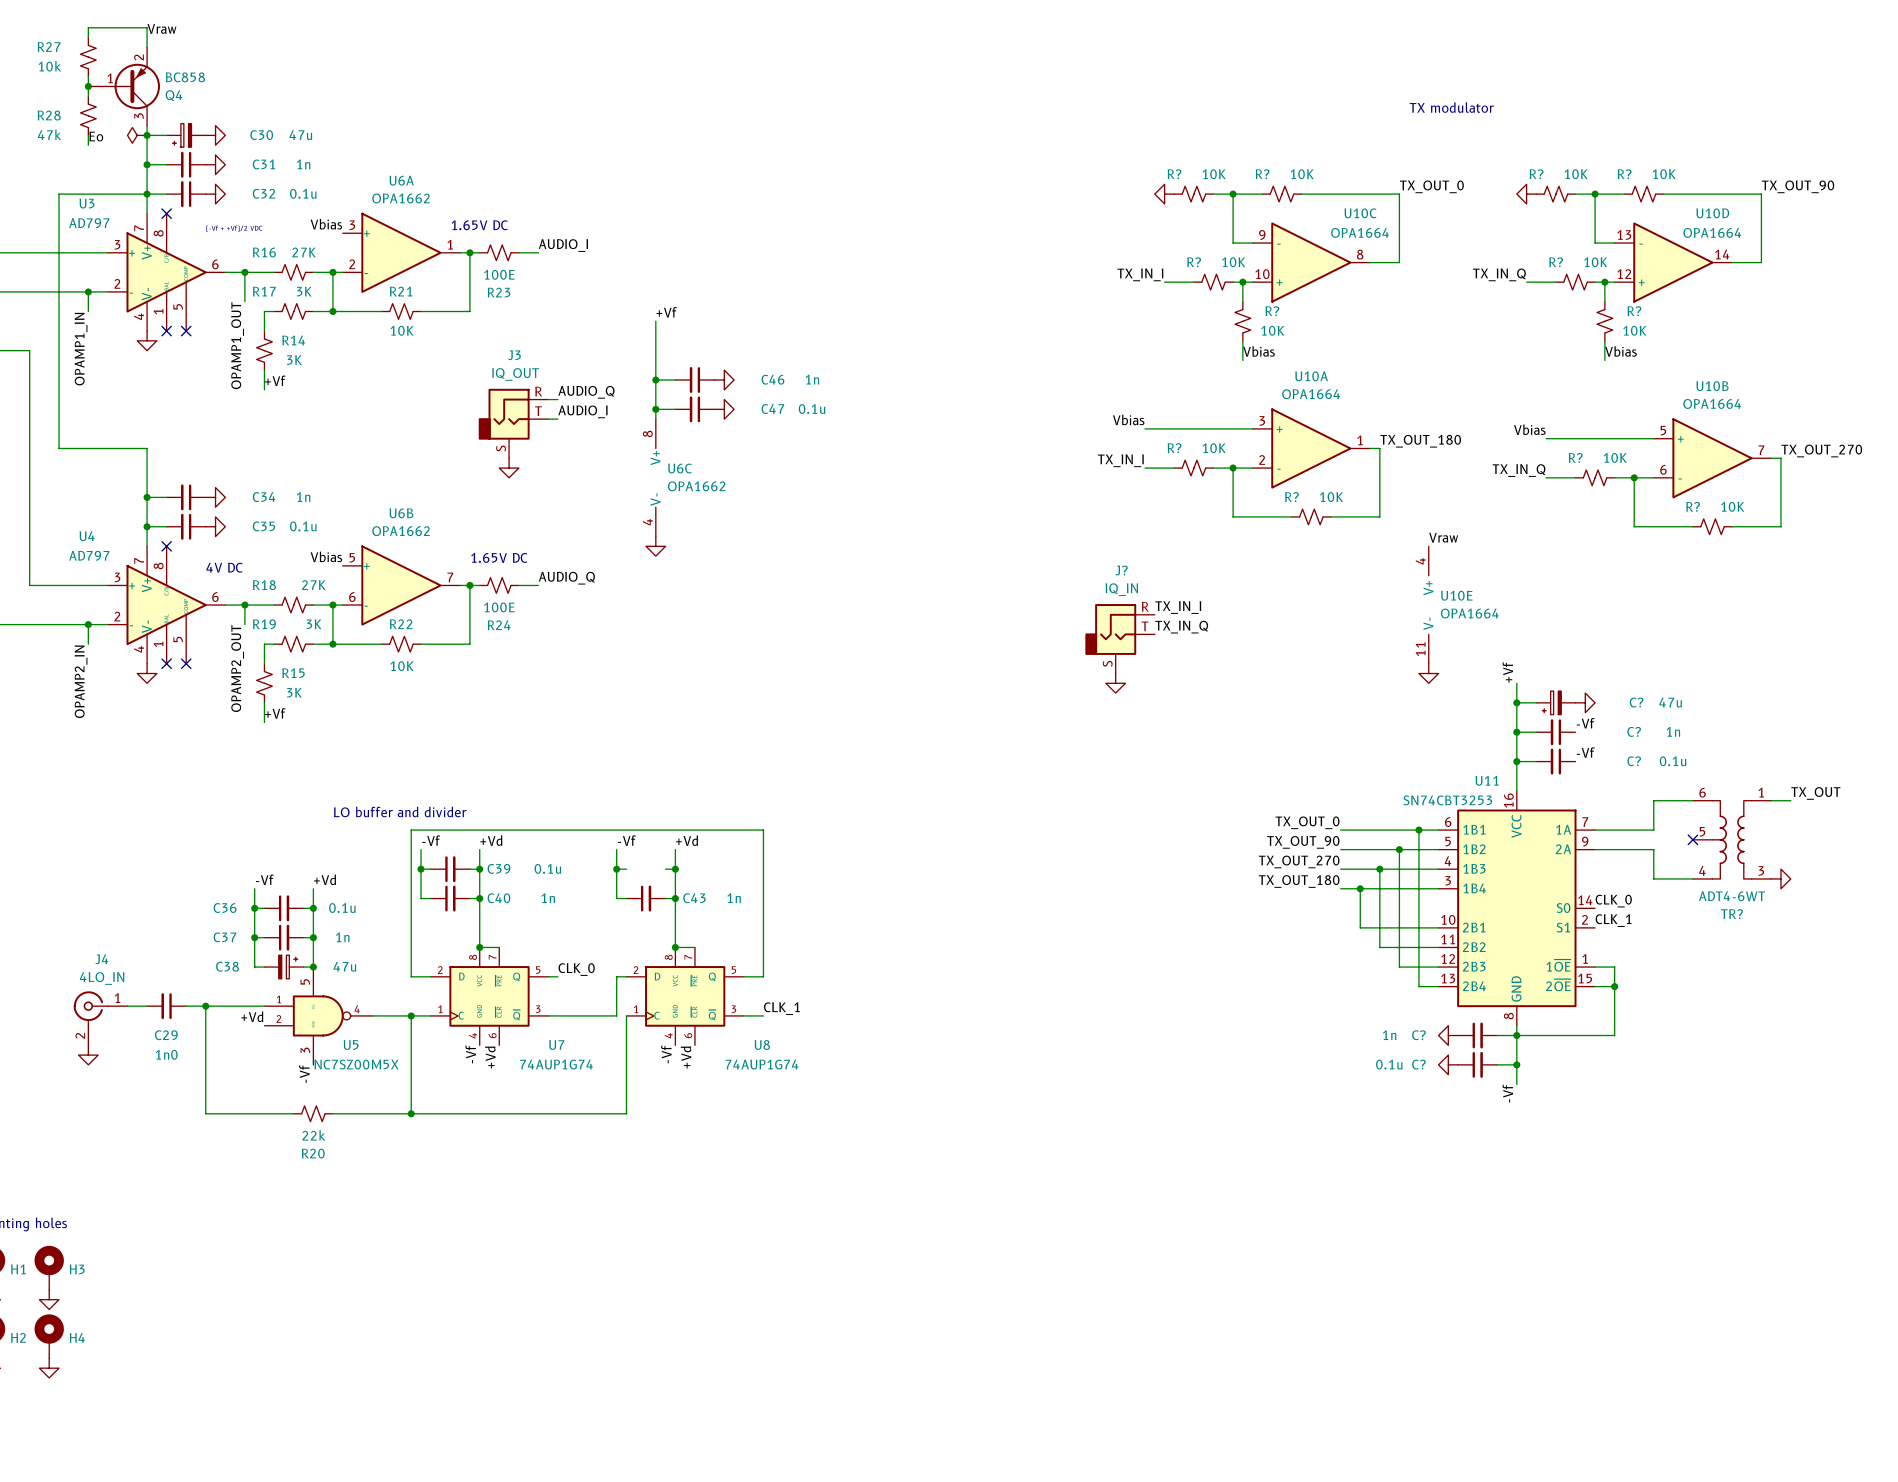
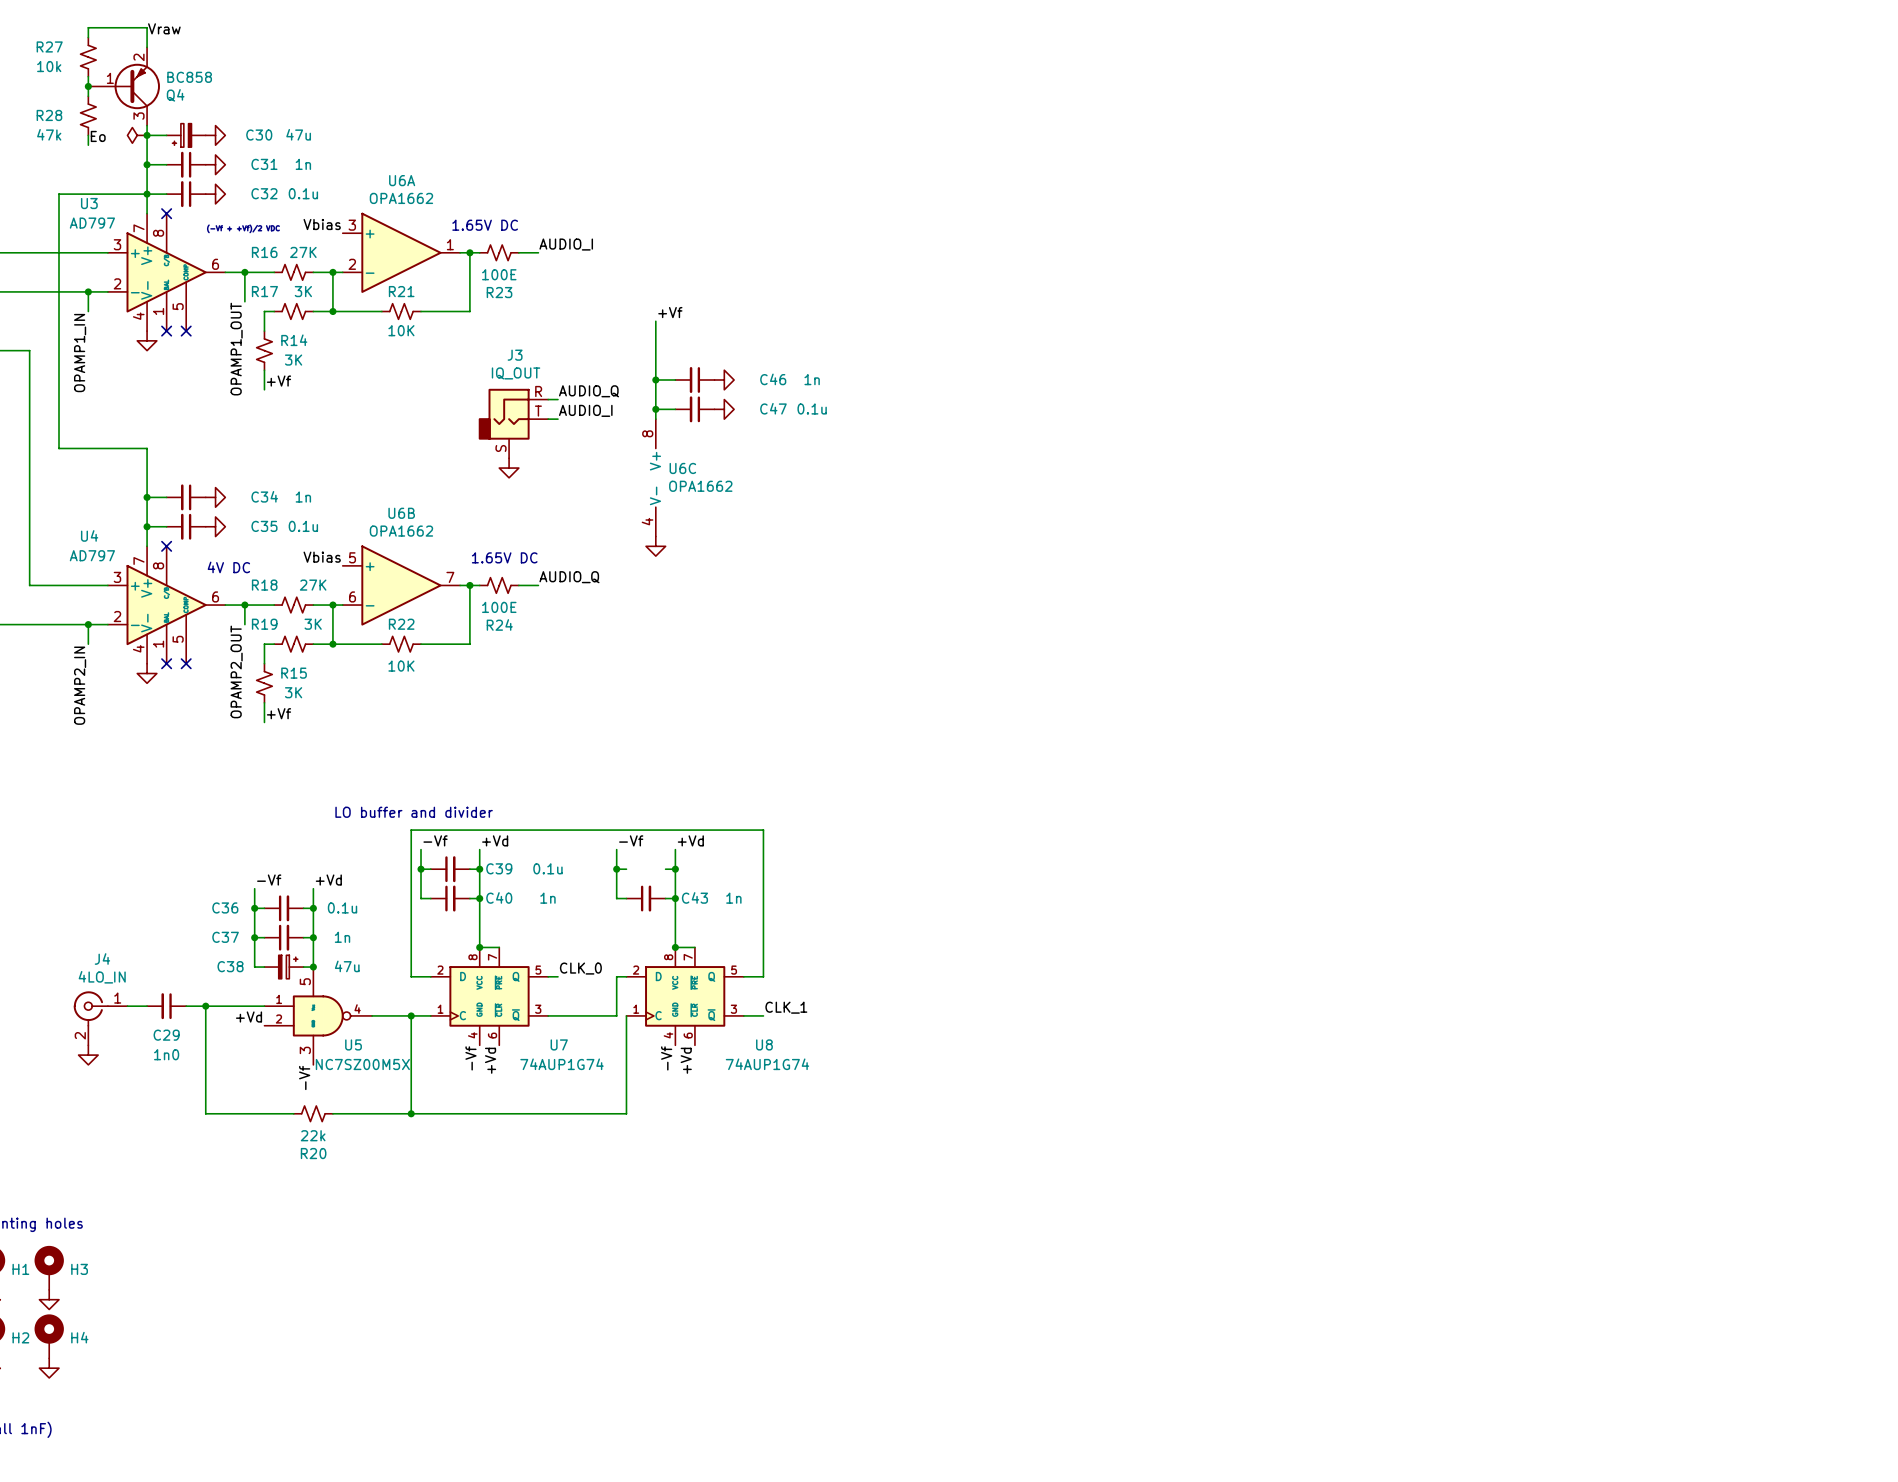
text: TX modulator (1451, 107) -> none
label: TX_OUT_0 (1431, 186) -> none
label: TX_OUT_90 (1798, 186) -> none
power symbol: (1164, 194) -> none
R?: 10K (1193, 194) -> none
wire: (1213, 194) (1262, 194) -> none
wire: (1233, 194) (1233, 243) (1252, 243) -> none
junction: (1233, 194) -> none
R?: 10K (1281, 194) -> none
wire: (1301, 194) (1399, 194) (1399, 262) (1370, 262) -> none
power symbol: (1526, 194) -> none
R?: 10K (1555, 194) -> none
wire: (1575, 194) (1624, 194) -> none
wire: (1595, 194) (1595, 243) (1614, 243) -> none
junction: (1595, 194) -> none
R?: 10K (1644, 194) -> none
wire: (1663, 194) (1761, 194) (1761, 262) (1732, 262) -> none
U10C: OPA1664 (1311, 262) -> none
U10D: OPA1664 (1673, 262) -> none
label: TX_IN_I (1140, 274) -> none
label: TX_IN_Q (1499, 274) -> none
wire: (1164, 282) (1193, 282) -> none
R?: 10K (1213, 282) -> none
wire: (1233, 282) (1252, 282) -> none
wire: (1242, 282) (1242, 301) -> none
junction: (1242, 282) -> none
wire: (1526, 282) (1555, 282) -> none
R?: 10K (1575, 282) -> none
wire: (1595, 282) (1614, 282) -> none
wire: (1604, 282) (1604, 301) -> none
junction: (1604, 282) -> none
R?: 10K (1242, 321) -> none
R?: 10K (1604, 321) -> none
wire: (1242, 340) (1242, 360) -> none
wire: (1604, 340) (1604, 360) -> none
label: Vbias (1259, 351) -> none
label: Vbias (1621, 351) -> none
label: Vbias (1128, 419) -> none
wire: (1145, 428) (1252, 428) -> none
label: Vbias (1529, 429) -> none
wire: (1546, 438) (1653, 438) -> none
label: TX_OUT_180 (1420, 441) -> none
U10A: OPA1664 (1311, 448) -> none
wire: (1370, 448) (1379, 448) (1379, 516) (1330, 516) -> none
label: TX_OUT_270 (1821, 451) -> none
U10B: OPA1664 (1712, 458) -> none
wire: (1771, 458) (1780, 458) (1780, 526) (1732, 526) -> none
label: TX_IN_I (1120, 460) -> none
wire: (1145, 468) (1174, 468) -> none
R?: 10K (1193, 468) -> none
wire: (1213, 468) (1252, 468) -> none
wire: (1233, 468) (1233, 516) (1291, 516) -> none
junction: (1233, 468) -> none
label: TX_IN_Q (1518, 470) -> none
wire: (1546, 477) (1575, 477) -> none
R?: 10K (1595, 477) -> none
wire: (1614, 477) (1653, 477) -> none
wire: (1634, 477) (1634, 526) (1692, 526) -> none
junction: (1634, 477) -> none
R?: 10K (1311, 516) -> none
R?: 10K (1712, 526) -> none
label: Vraw (1443, 537) -> none
U10E: OPA1664 (1428, 605) -> none
label: TX_IN_I (1178, 607) -> none
label: TX_IN_Q (1181, 627) -> none
J?: IQ_IN (1120, 638) -> none
label: +Vf (1507, 672) -> none
power symbol: (1428, 673) -> none
power symbol: (1115, 683) -> none
wire: (1516, 683) (1516, 790) -> none
wire: (1516, 702) (1536, 702) -> none
junction: (1516, 702) -> none
C?: 47u (1555, 702) -> none
power symbol: (1585, 702) -> none
label: -Vf (1585, 723) -> none
wire: (1516, 732) (1536, 732) -> none
junction: (1516, 732) -> none
C?: 1n (1555, 732) -> none
label: -Vf (1585, 752) -> none
wire: (1516, 761) (1536, 761) -> none
junction: (1516, 761) -> none
C?: 0.1u (1555, 761) -> none
label: TX_OUT (1815, 793) -> none
wire: (1692, 800) (1653, 800) (1653, 830) (1595, 830) -> none
wire: (1771, 800) (1790, 800) -> none
label: TX_OUT_0 (1307, 822) -> none
wire: (1340, 830) (1438, 830) -> none
wire: (1418, 830) (1418, 986) (1438, 986) -> none
junction: (1418, 830) -> none
no-connect mark: (1692, 839) -> none
TR?: ADT4-6WT (1732, 839) -> none
label: TX_OUT_90 (1303, 842) -> none
wire: (1340, 849) (1438, 849) -> none
wire: (1399, 849) (1399, 967) (1438, 967) -> none
junction: (1399, 849) -> none
wire: (1595, 849) (1653, 849) (1653, 878) (1692, 878) -> none
label: TX_OUT_270 (1299, 861) -> none
wire: (1340, 869) (1438, 869) -> none
wire: (1379, 869) (1379, 947) (1438, 947) -> none
junction: (1379, 869) -> none
power symbol: (1780, 878) -> none
label: TX_OUT_180 (1299, 881) -> none
wire: (1340, 888) (1438, 888) -> none
wire: (1360, 888) (1360, 927) (1438, 927) -> none
junction: (1360, 888) -> none
label: CLK_0 (1613, 901) -> none
U11: SN74CBT3253 (1516, 908) -> none
label: CLK_1 (1613, 920) -> none
wire: (1595, 967) (1614, 967) (1614, 1035) (1497, 1035) -> none
wire: (1595, 986) (1614, 986) -> none
junction: (1614, 986) -> none
wire: (1516, 1025) (1516, 1084) -> none
power symbol: (1448, 1035) -> none
C?: 1n (1477, 1035) -> none
junction: (1516, 1035) -> none
power symbol: (1448, 1064) -> none
C?: 0.1u (1477, 1064) -> none
wire: (1497, 1064) (1516, 1064) -> none
junction: (1516, 1064) -> none
label: -Vf (1507, 1093) -> none

